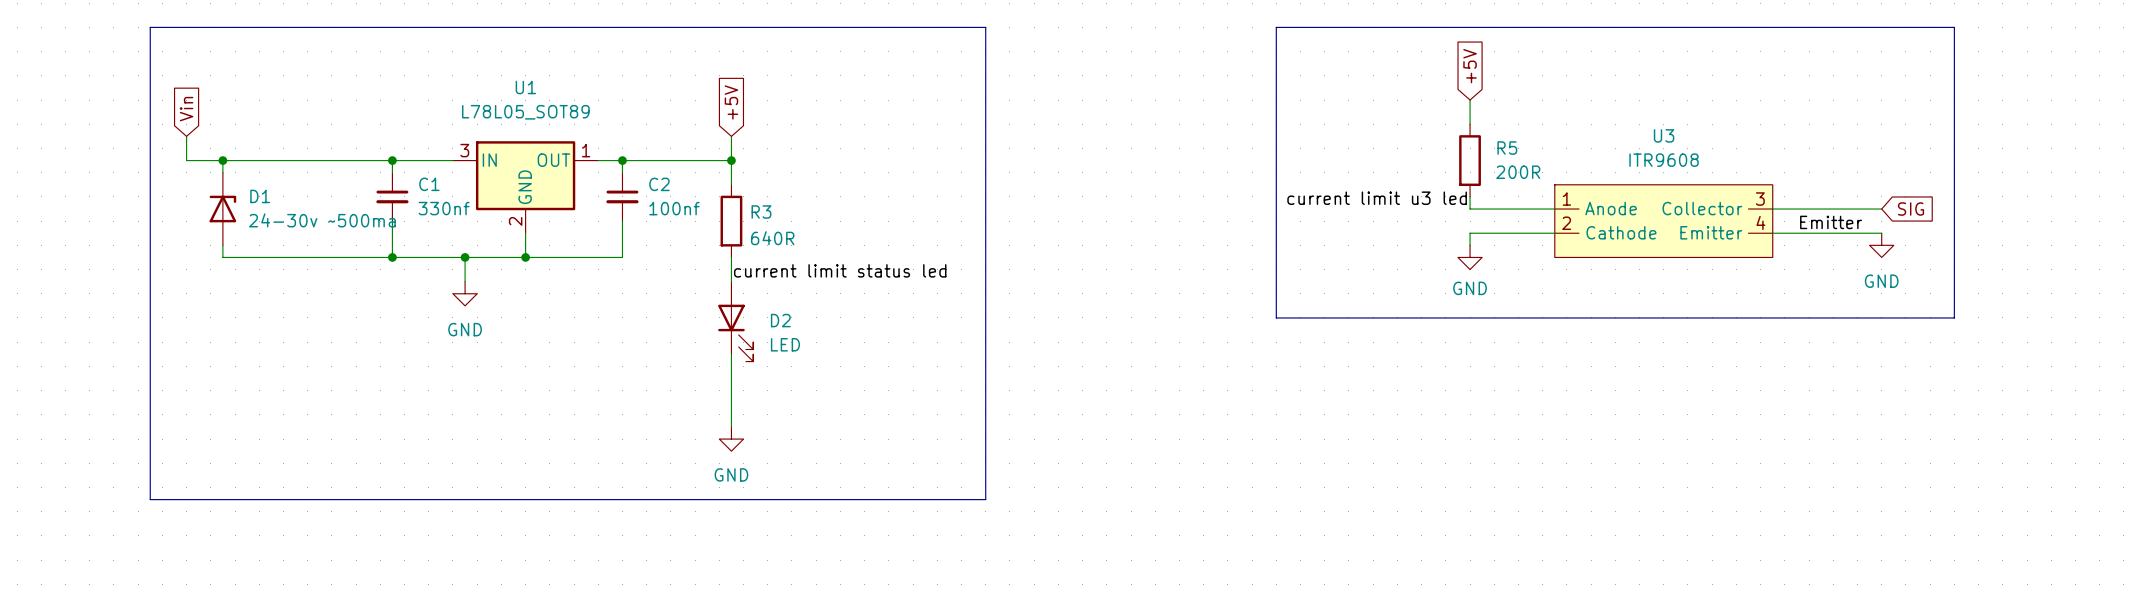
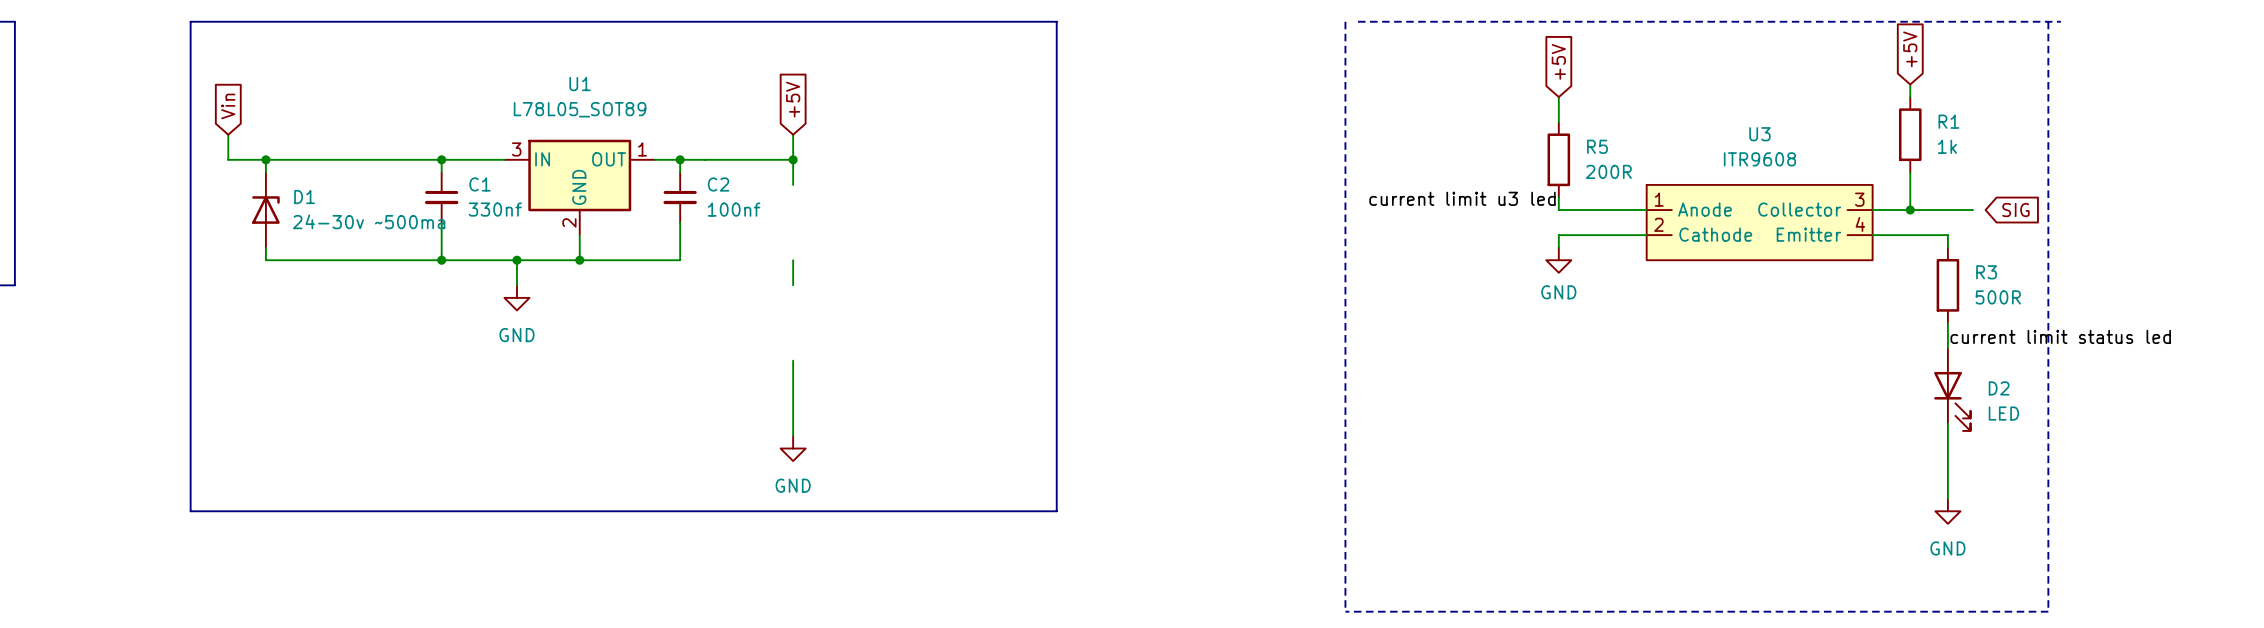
line: none -> (1345, 21) (1345, 611) (2048, 611) (2048, 21)
line: (1276, 27) (1954, 27) (1954, 317) (1276, 317) (1276, 27) -> (1357, 21) (2060, 21)
global label: none -> +5V (1910, 49)
wire: none -> (1910, 84) (1910, 97)
R1: none -> 1k (1910, 134)
wire: none -> (1910, 172) (1910, 210)
junction: none -> (1910, 210)
wire: (1869, 209) (1881, 209) -> none
R3 name position: R3 (761, 212) -> R3 (1986, 272)
R3 position: (731, 221) -> (1947, 285)
label: Emitter (1831, 222) -> none
wire: (1845, 233) (1881, 233) -> (1947, 235) (1947, 247)
R3 value: 640R (772, 238) -> 500R (1998, 297)
power symbol: GND (1881, 245) -> none
label: current limit status led (840, 270) -> none
wire: none -> (1947, 322) (1947, 348)
D2 position: (735, 321) -> (1952, 389)
label: none -> current limit status led (2060, 336)
wire: none -> (1947, 423) (1947, 498)
power symbol: none -> GND (1947, 511)

